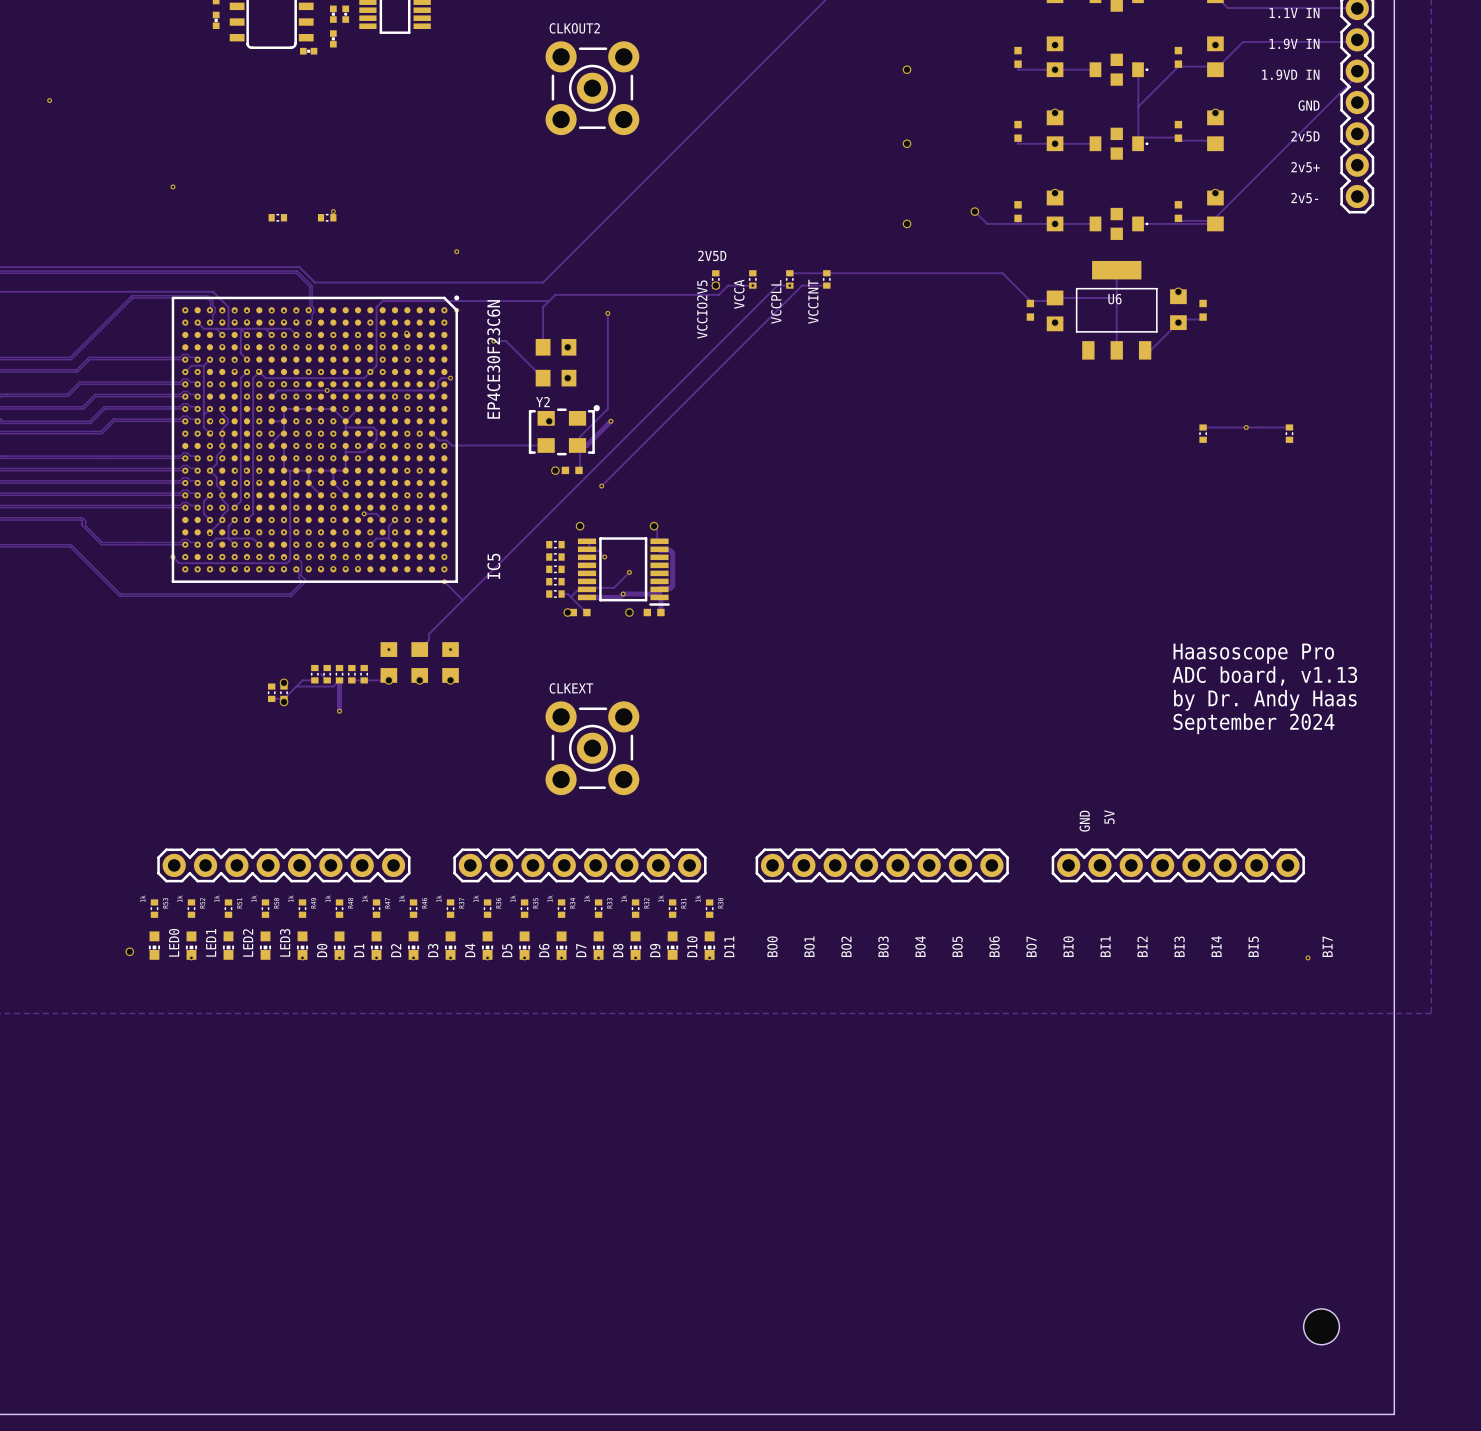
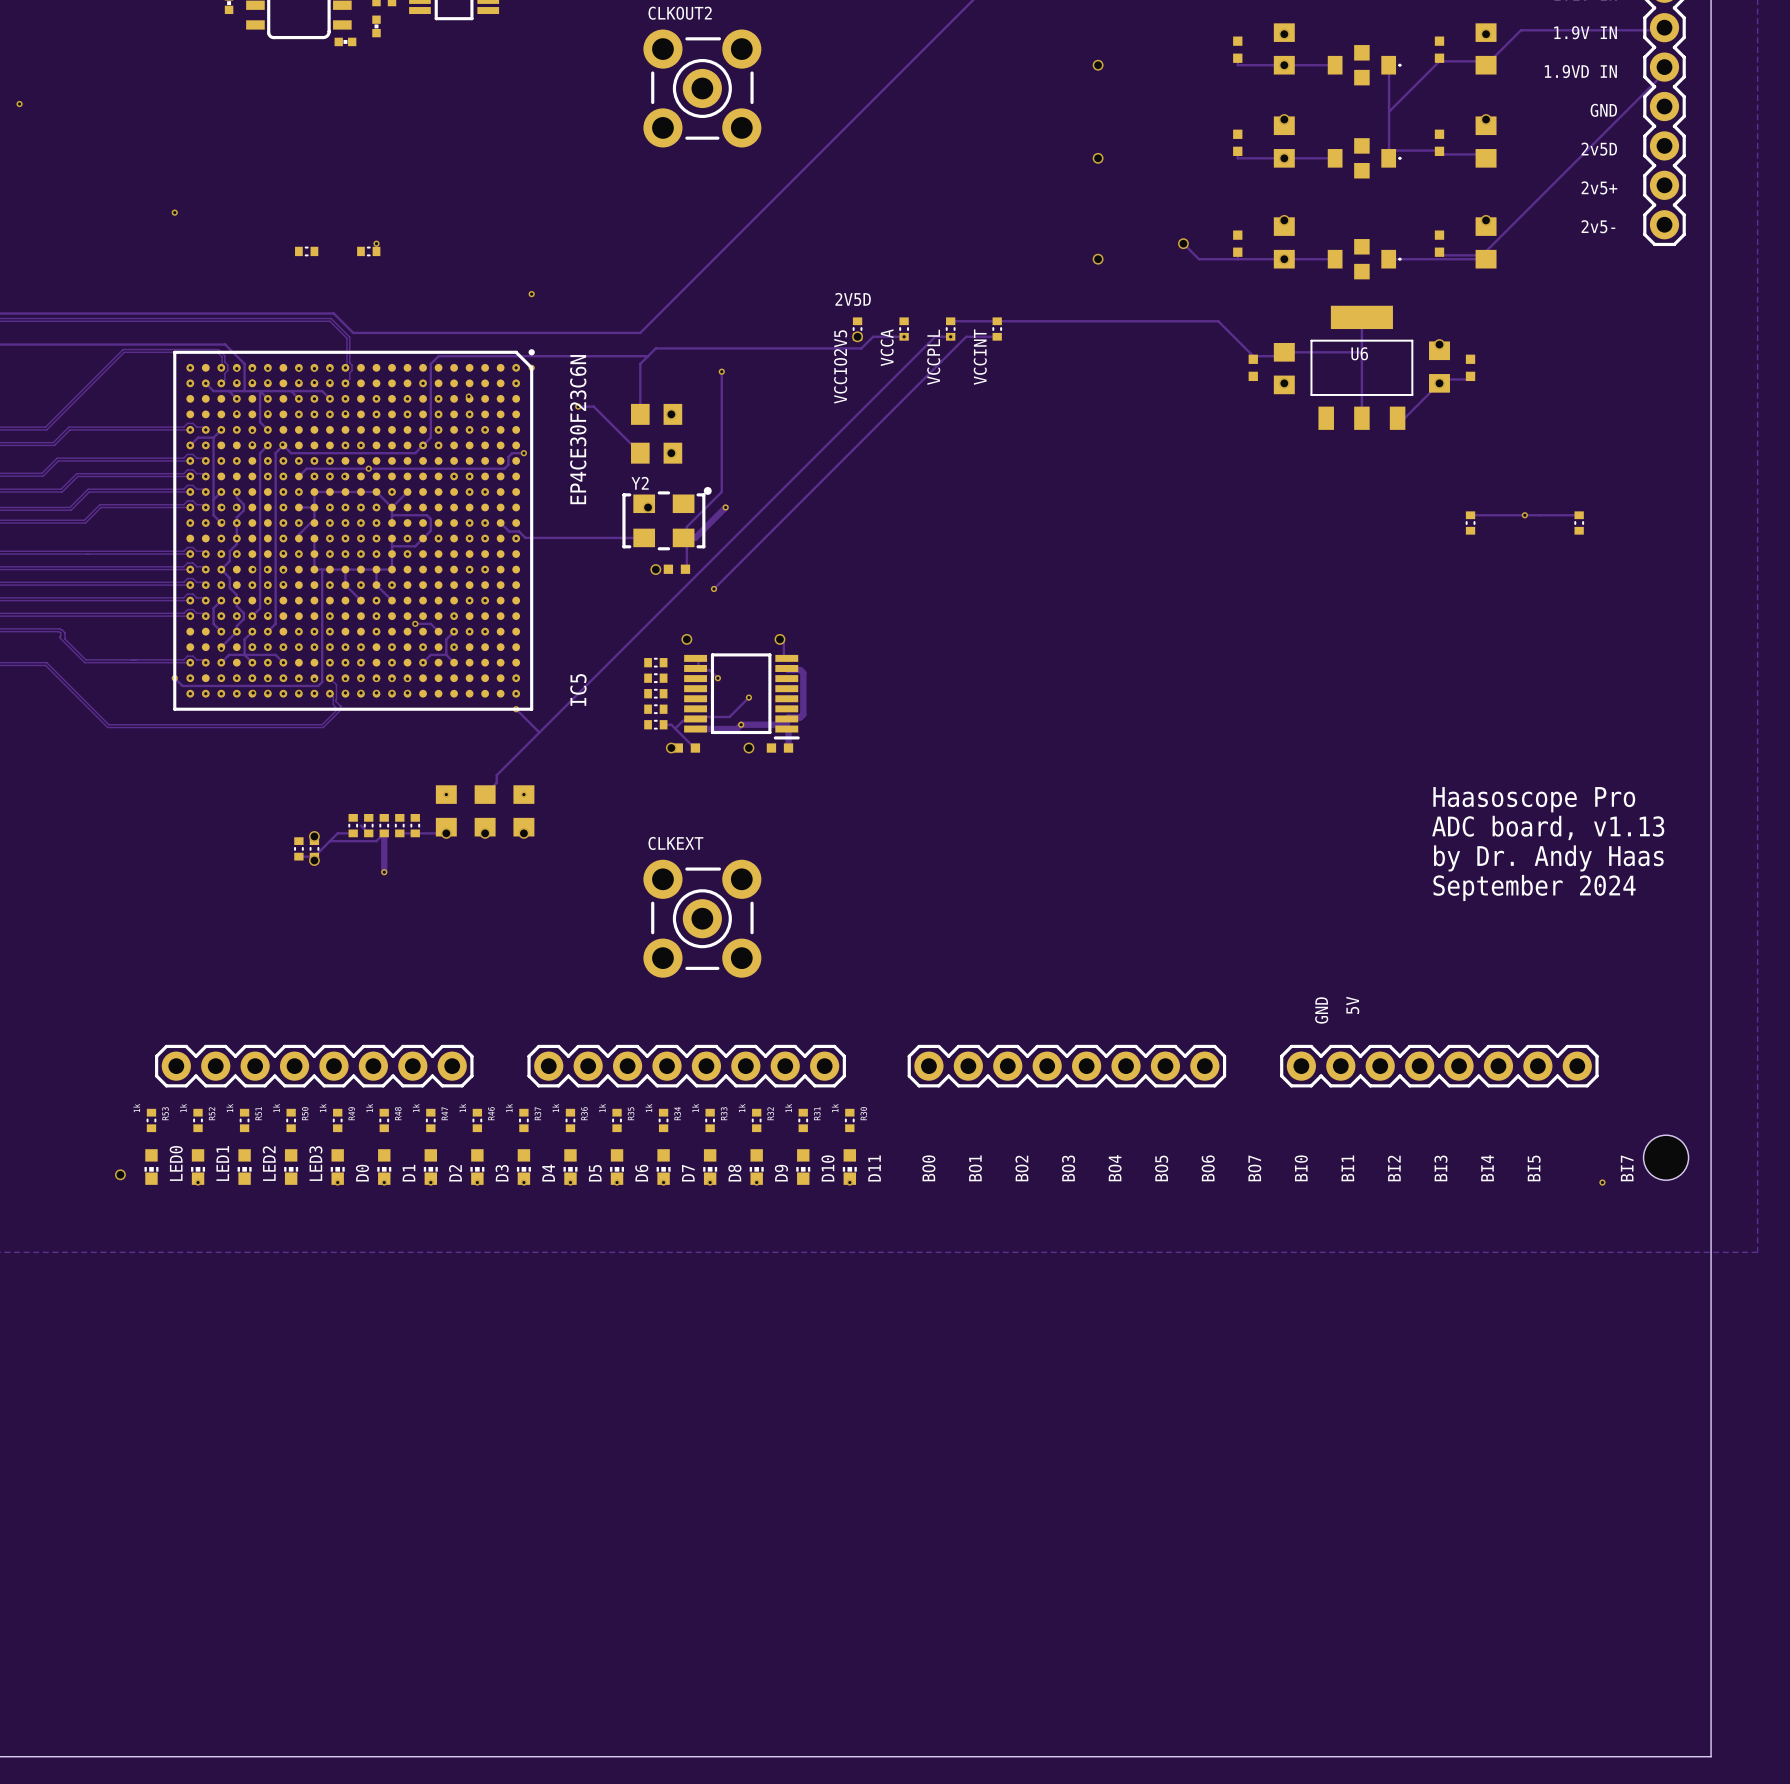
hole: none -> (1666, 1157)
hole: (1321, 1326) -> none

